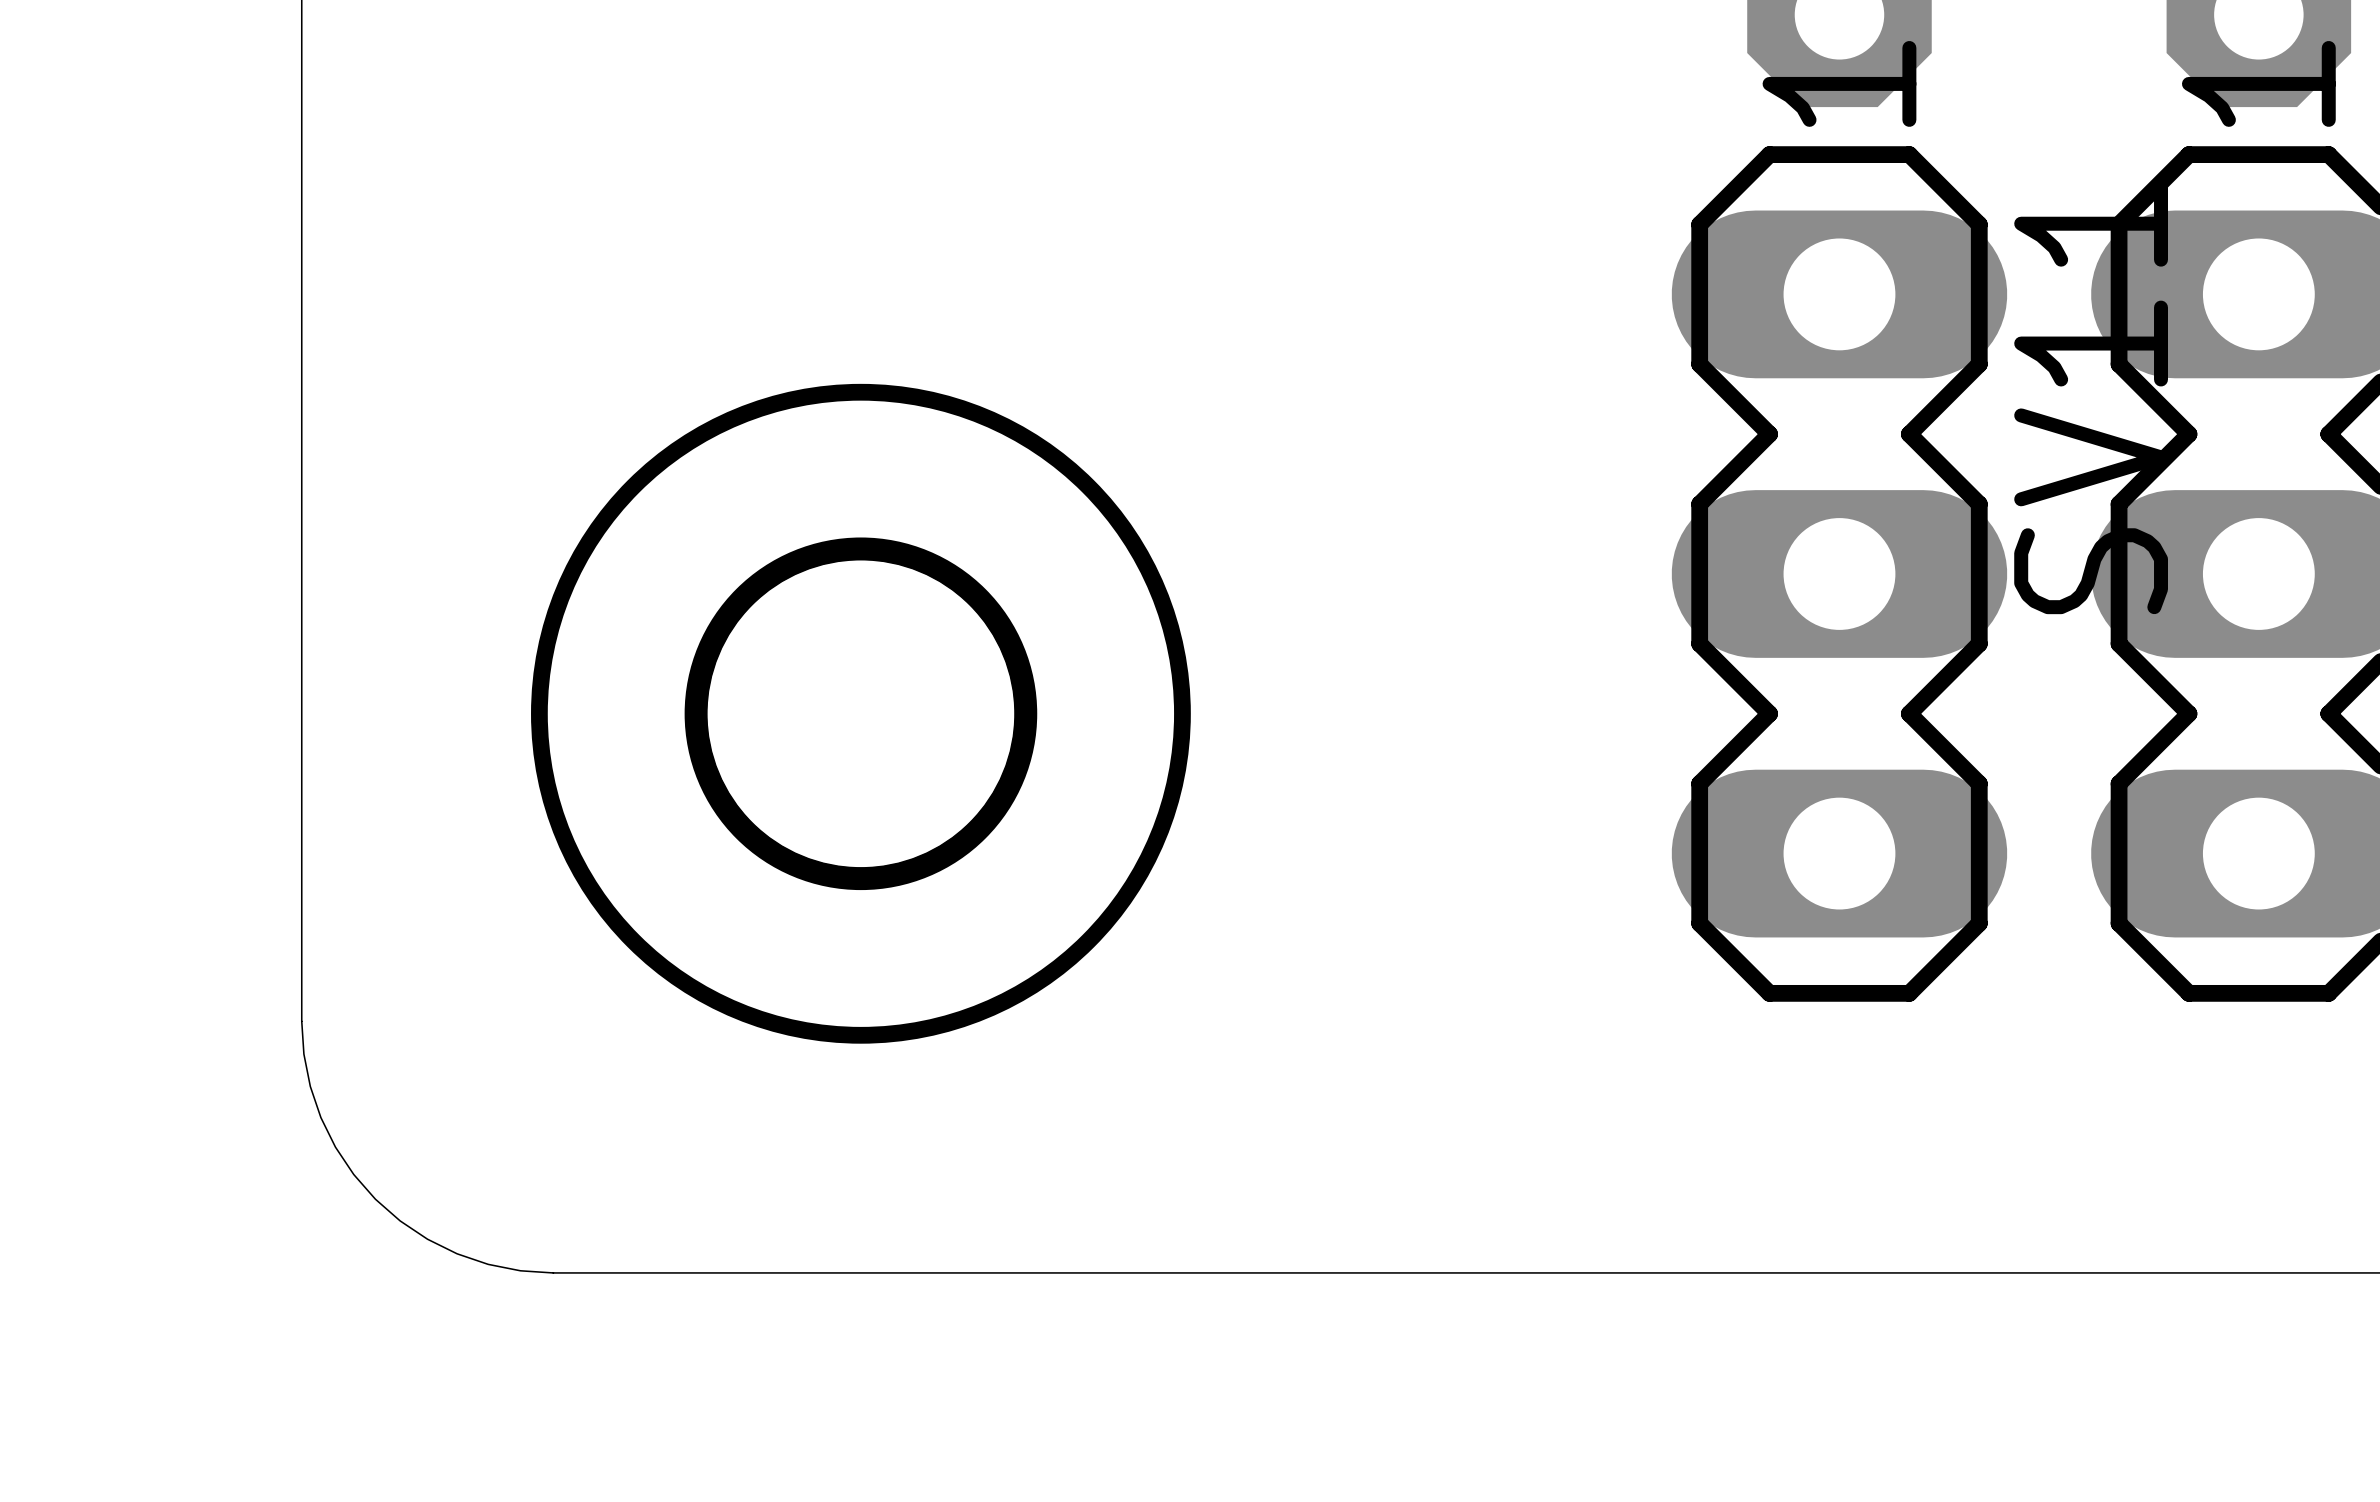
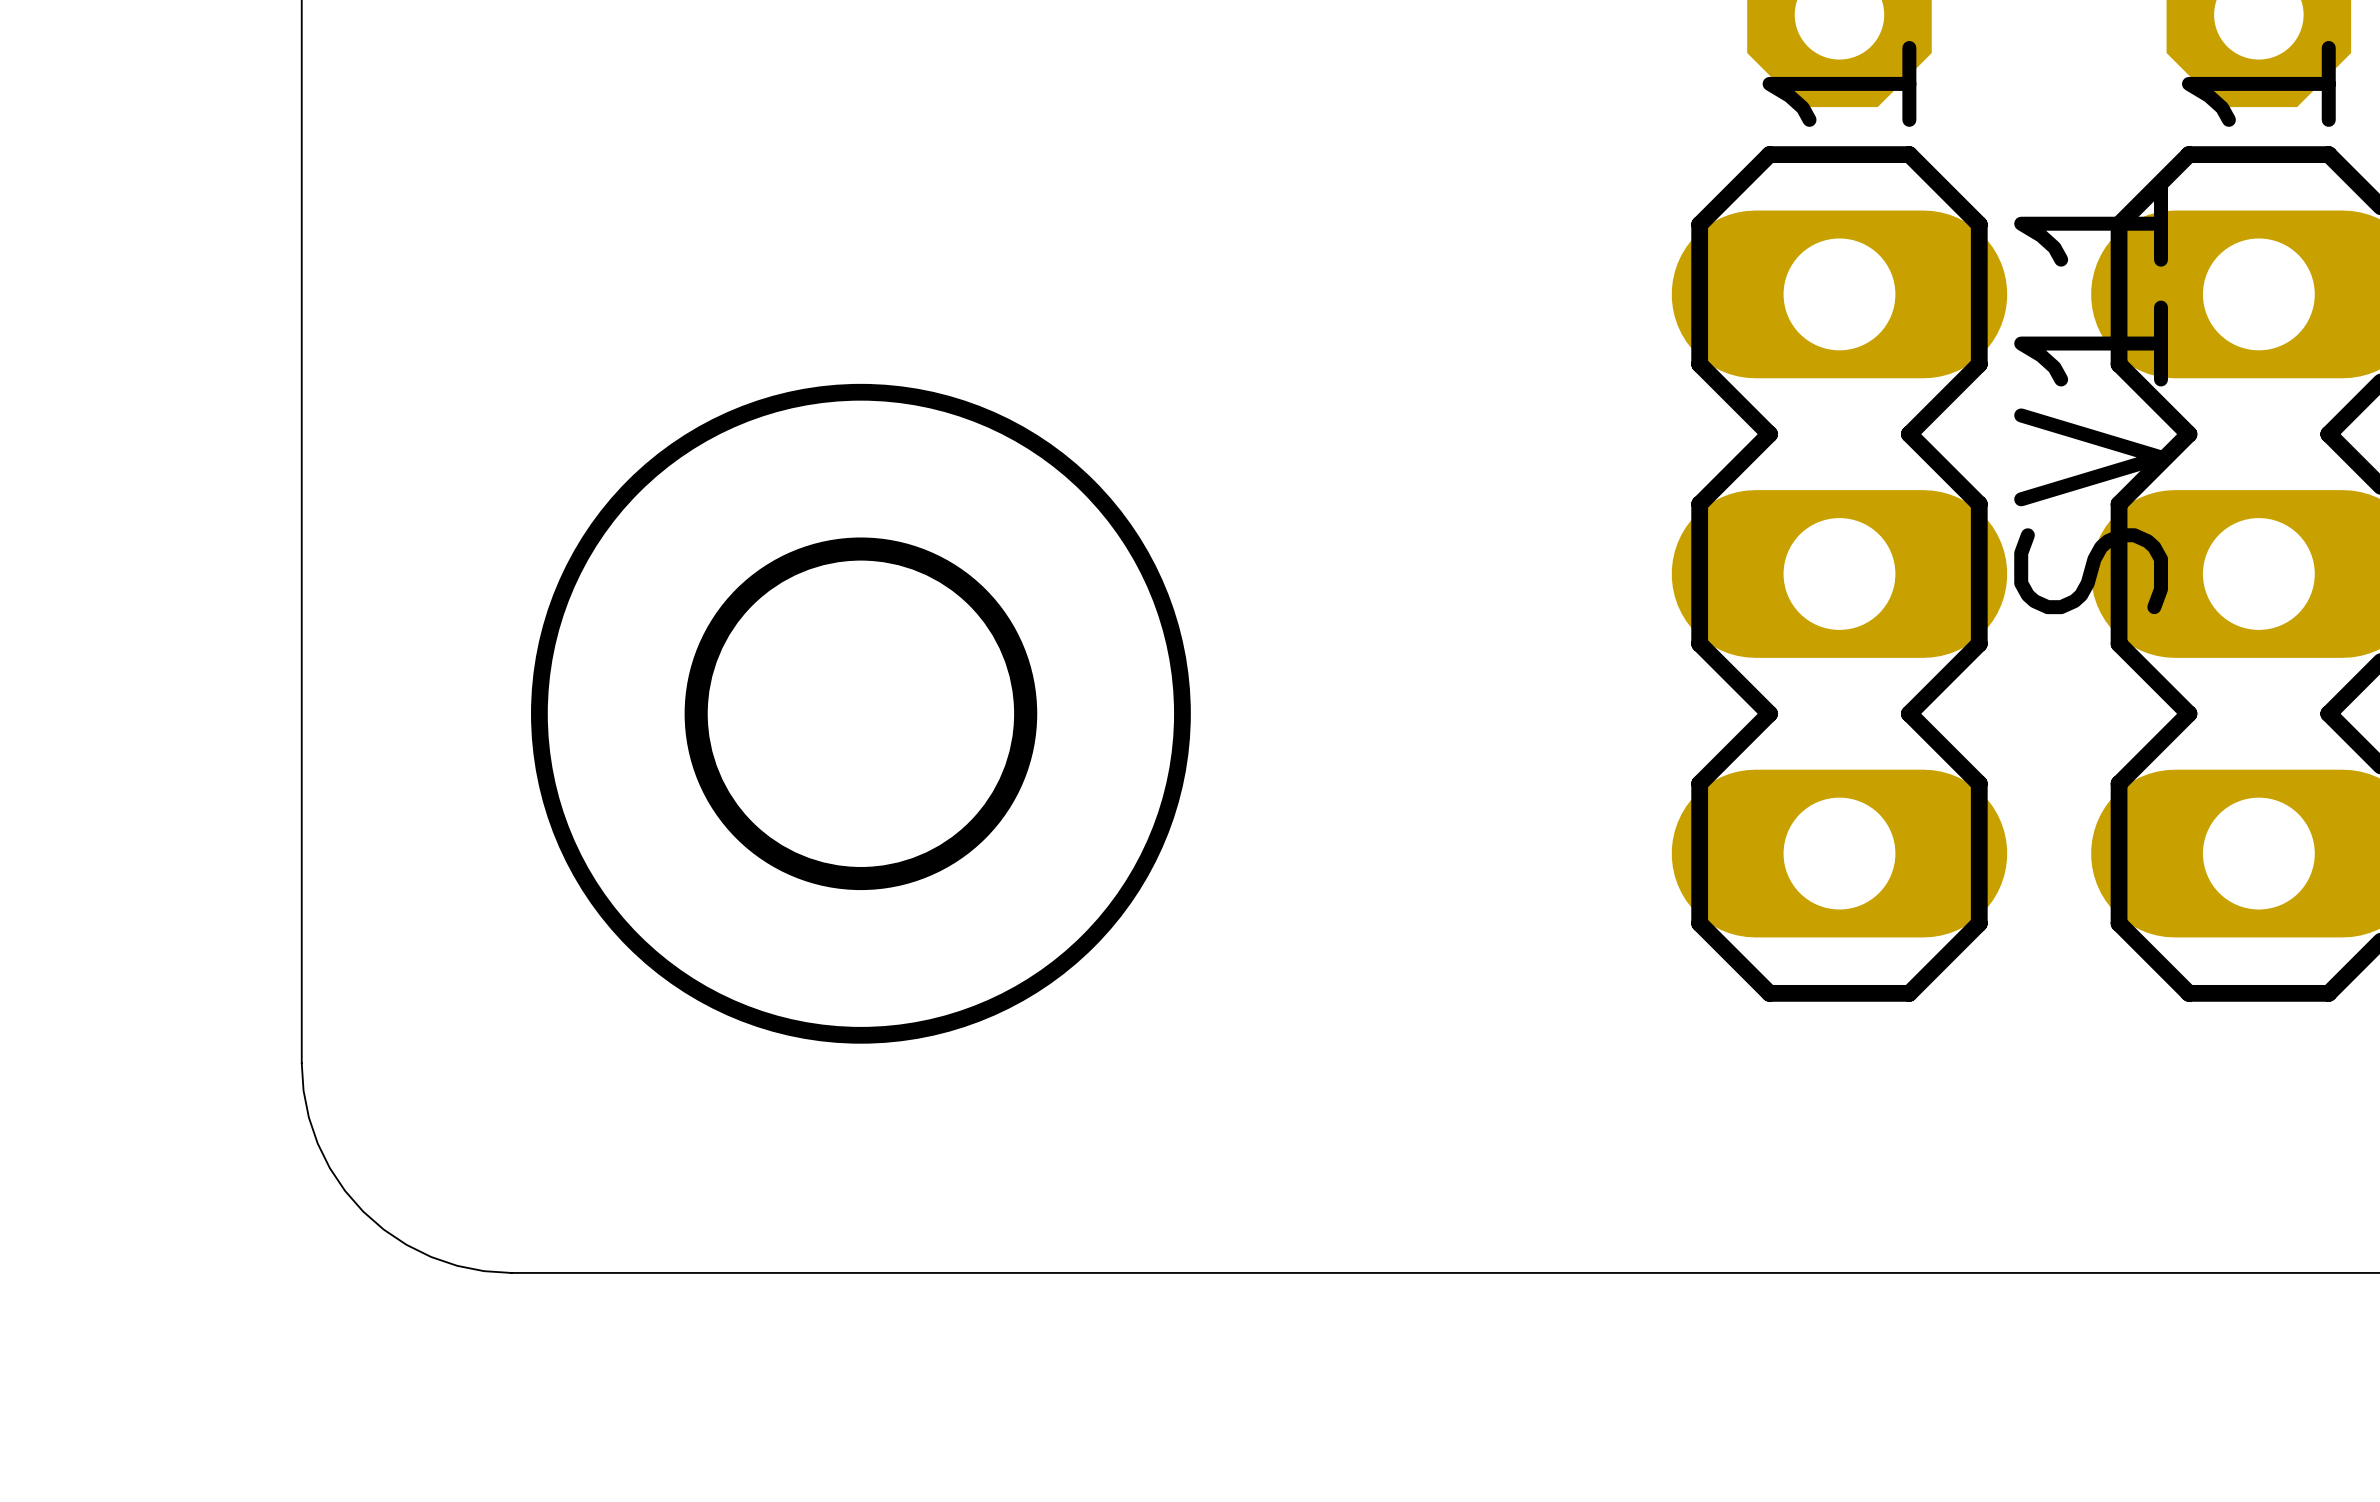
board edge: (301, 1021) (303, 1054) (310, 1086) (320, 1117) (335, 1147) (353, 1174) (375, 1199) (400, 1220) (427, 1239) (457, 1253) (488, 1264) (520, 1270) (553, 1272) -> (301, 1021) (303, 1090) (308, 1117) (317, 1143) (329, 1168) (345, 1190) (363, 1211) (383, 1229) (406, 1244) (431, 1256) (457, 1265) (484, 1271) (553, 1272)

